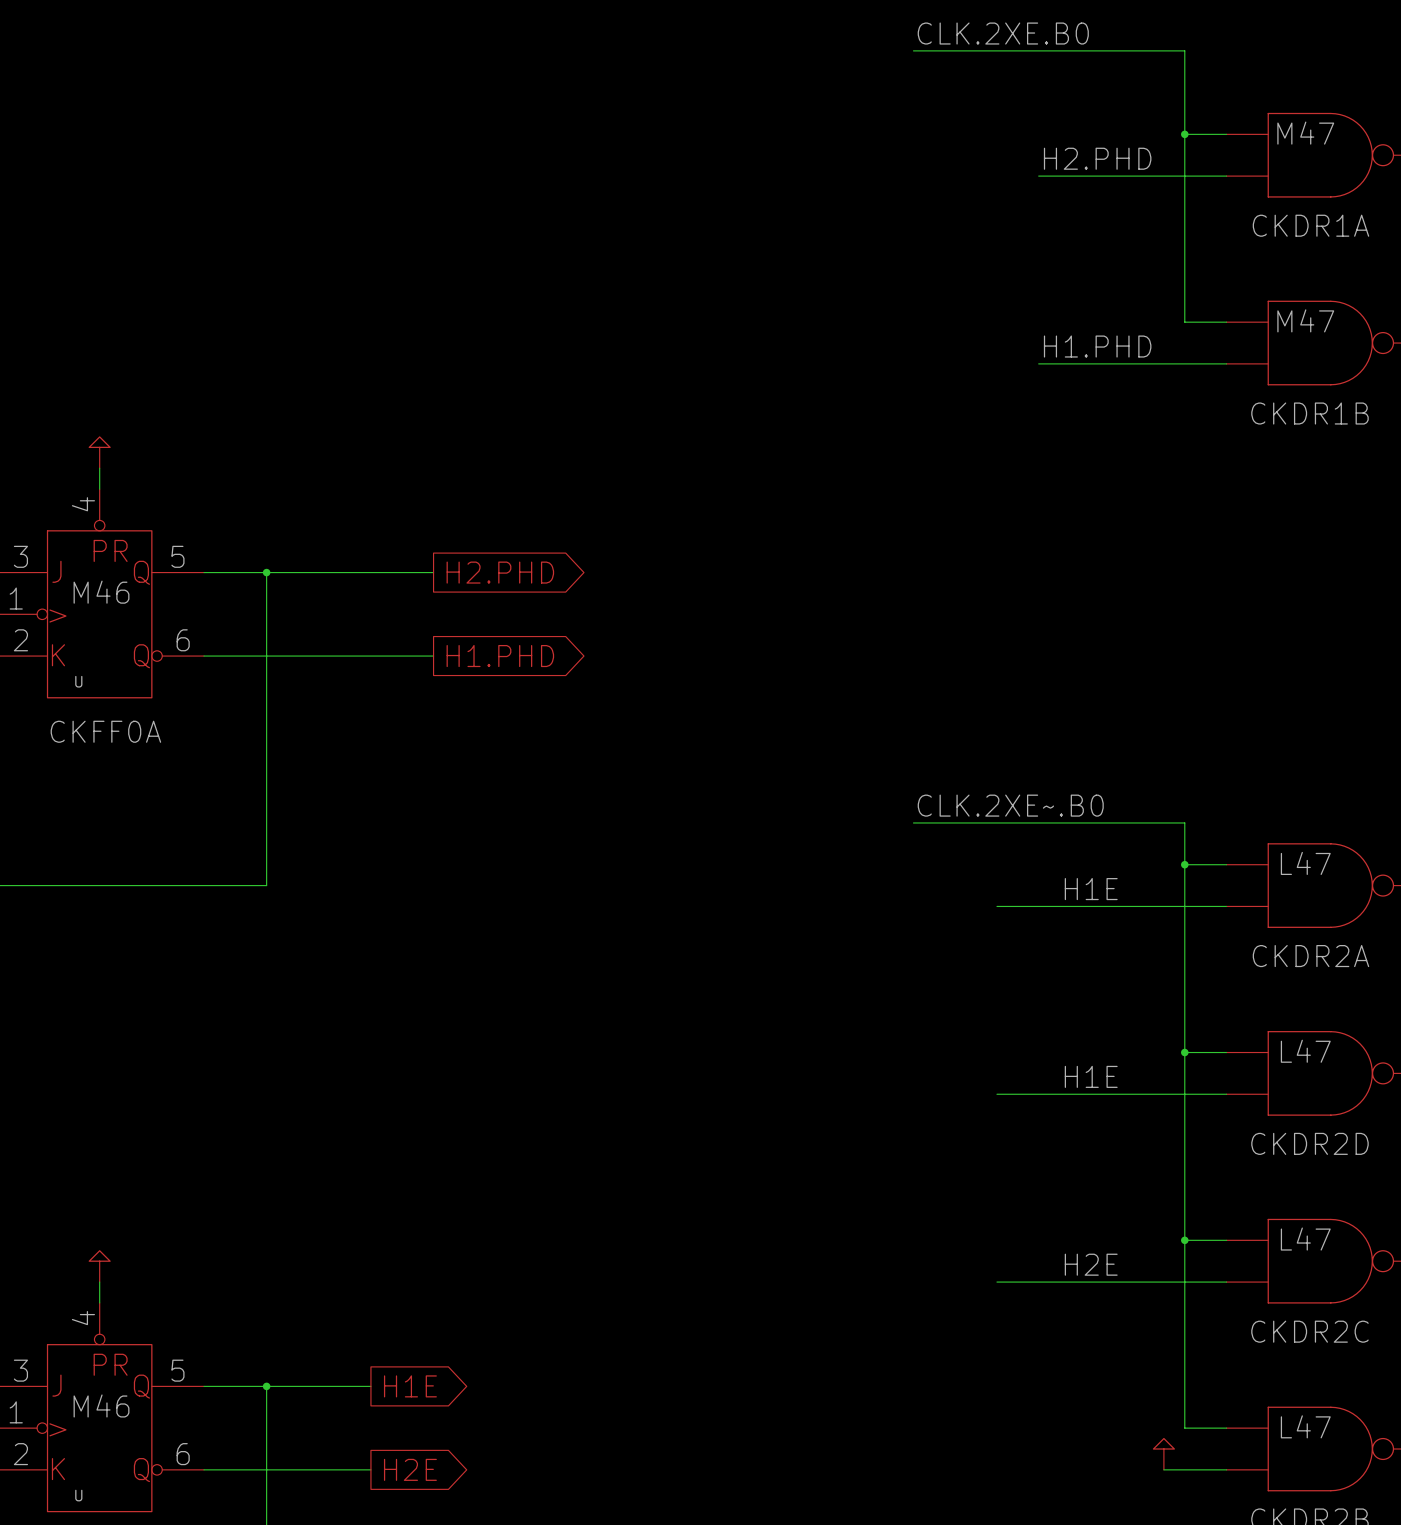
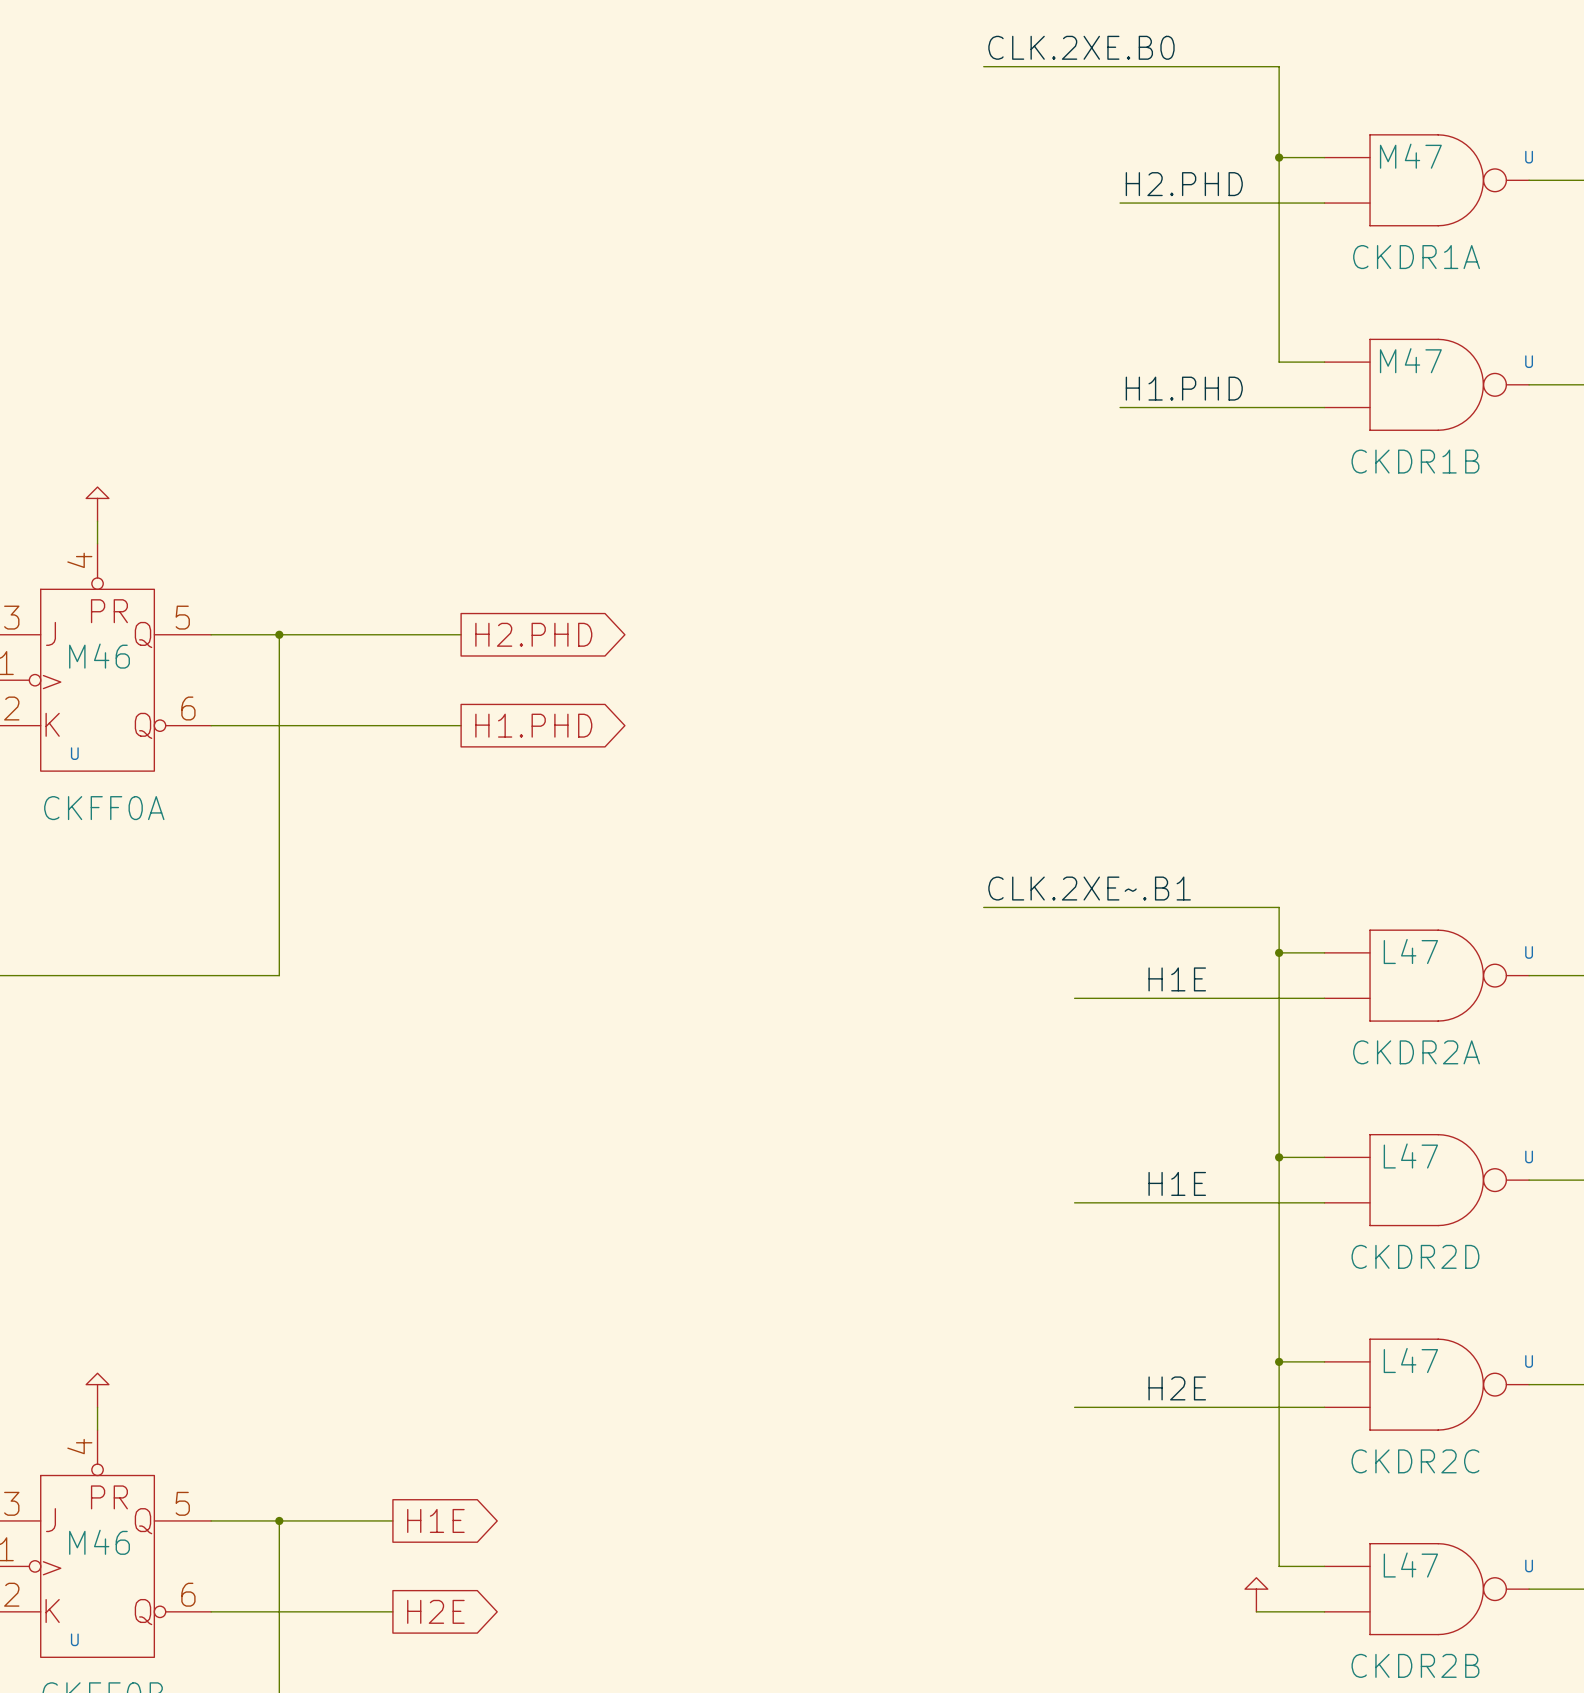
label: CLK.2XE~.B0 (1010, 805) -> CLK.2XE~.B1 (1089, 888)

